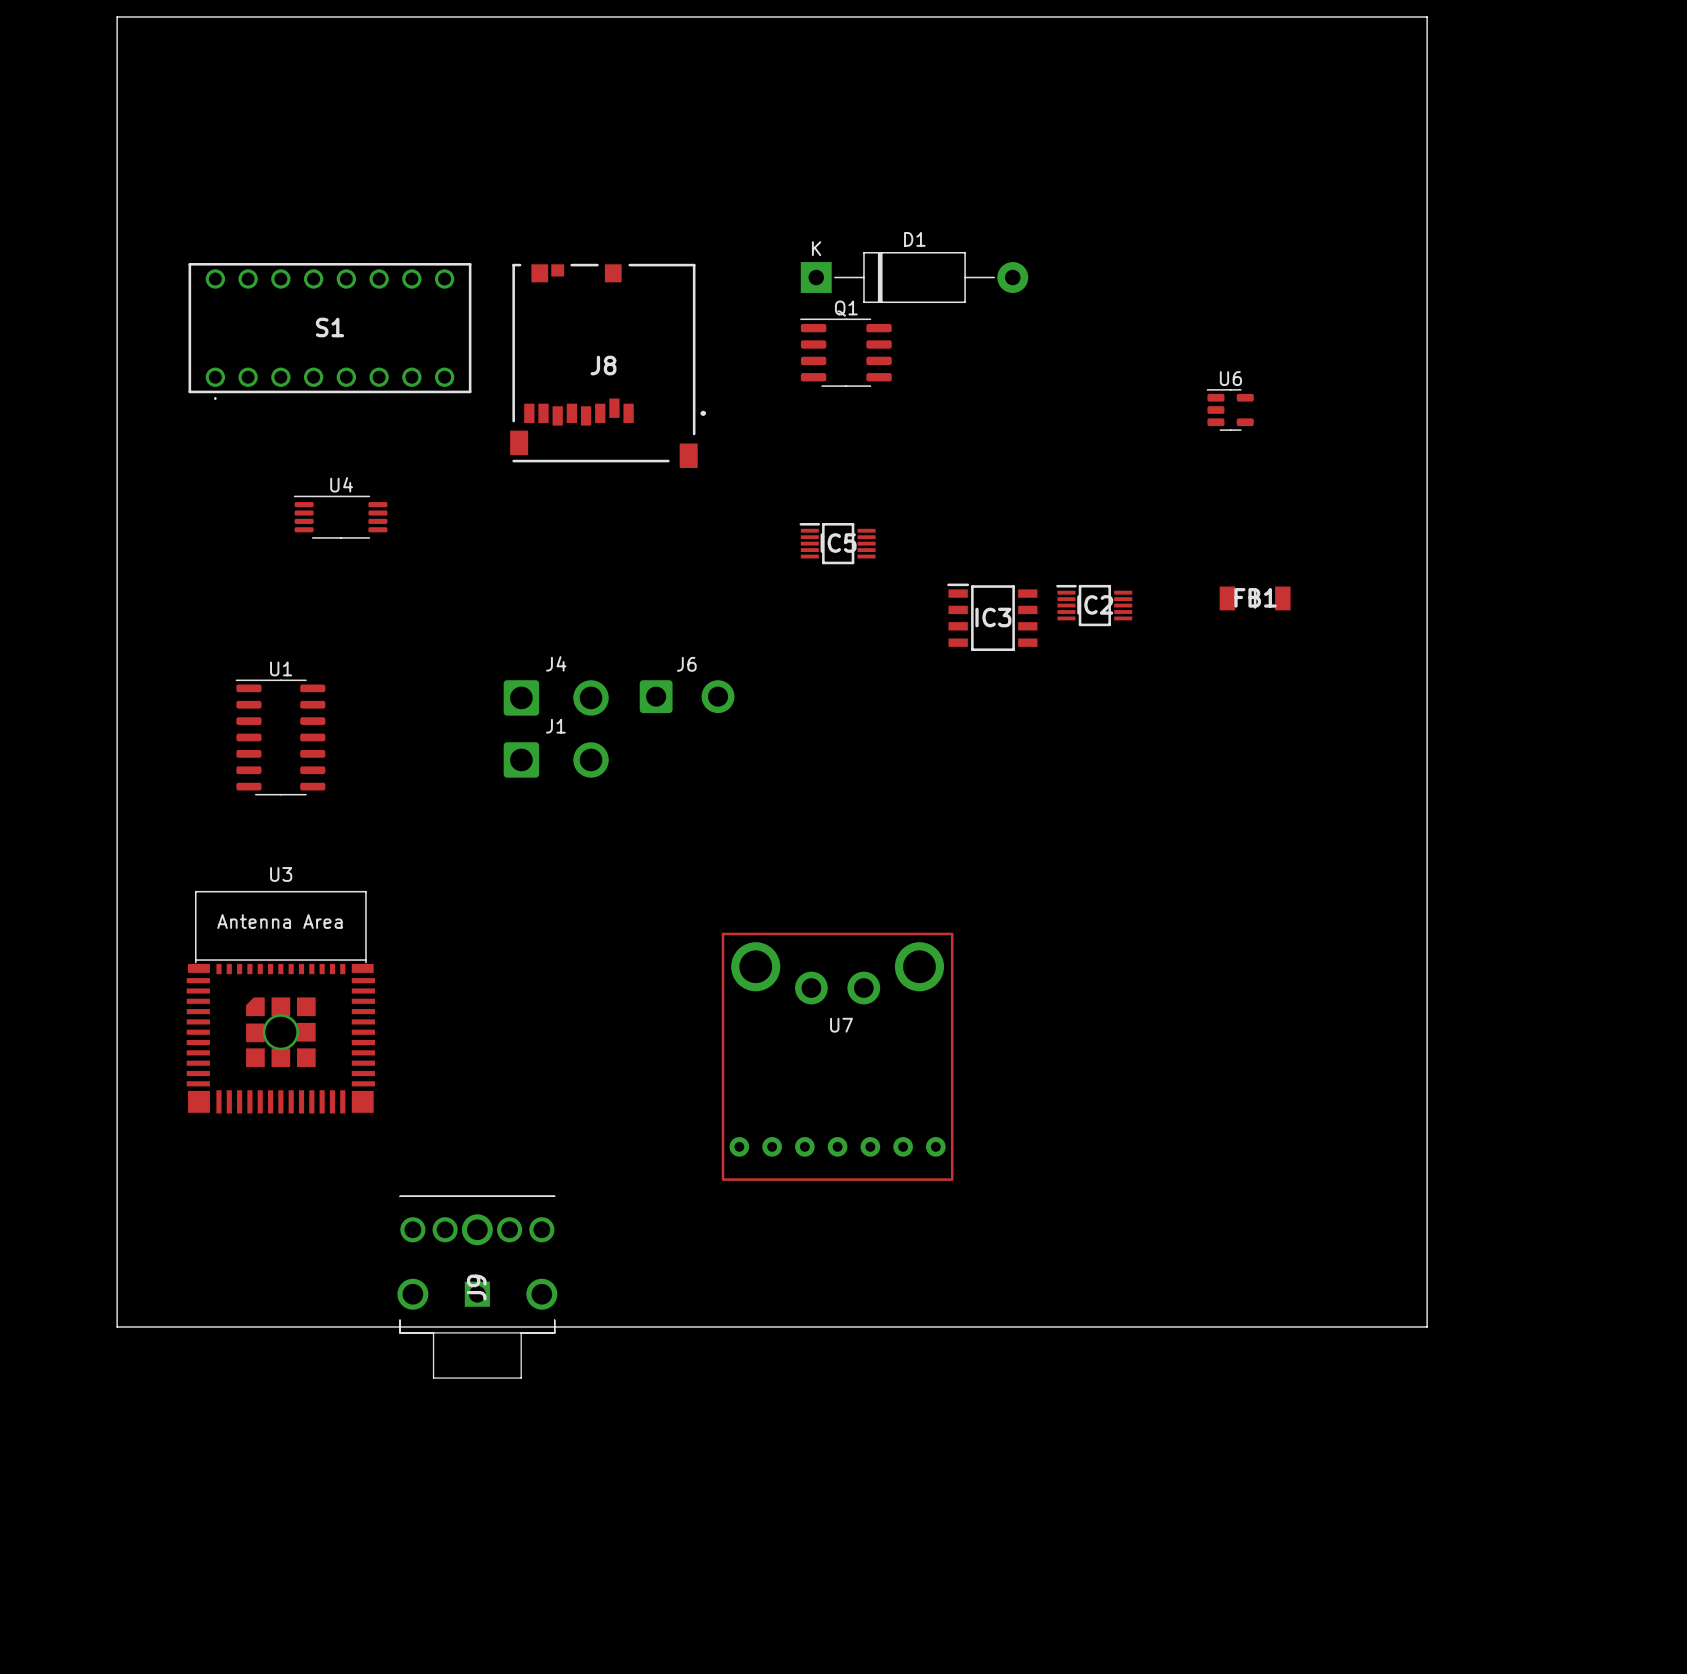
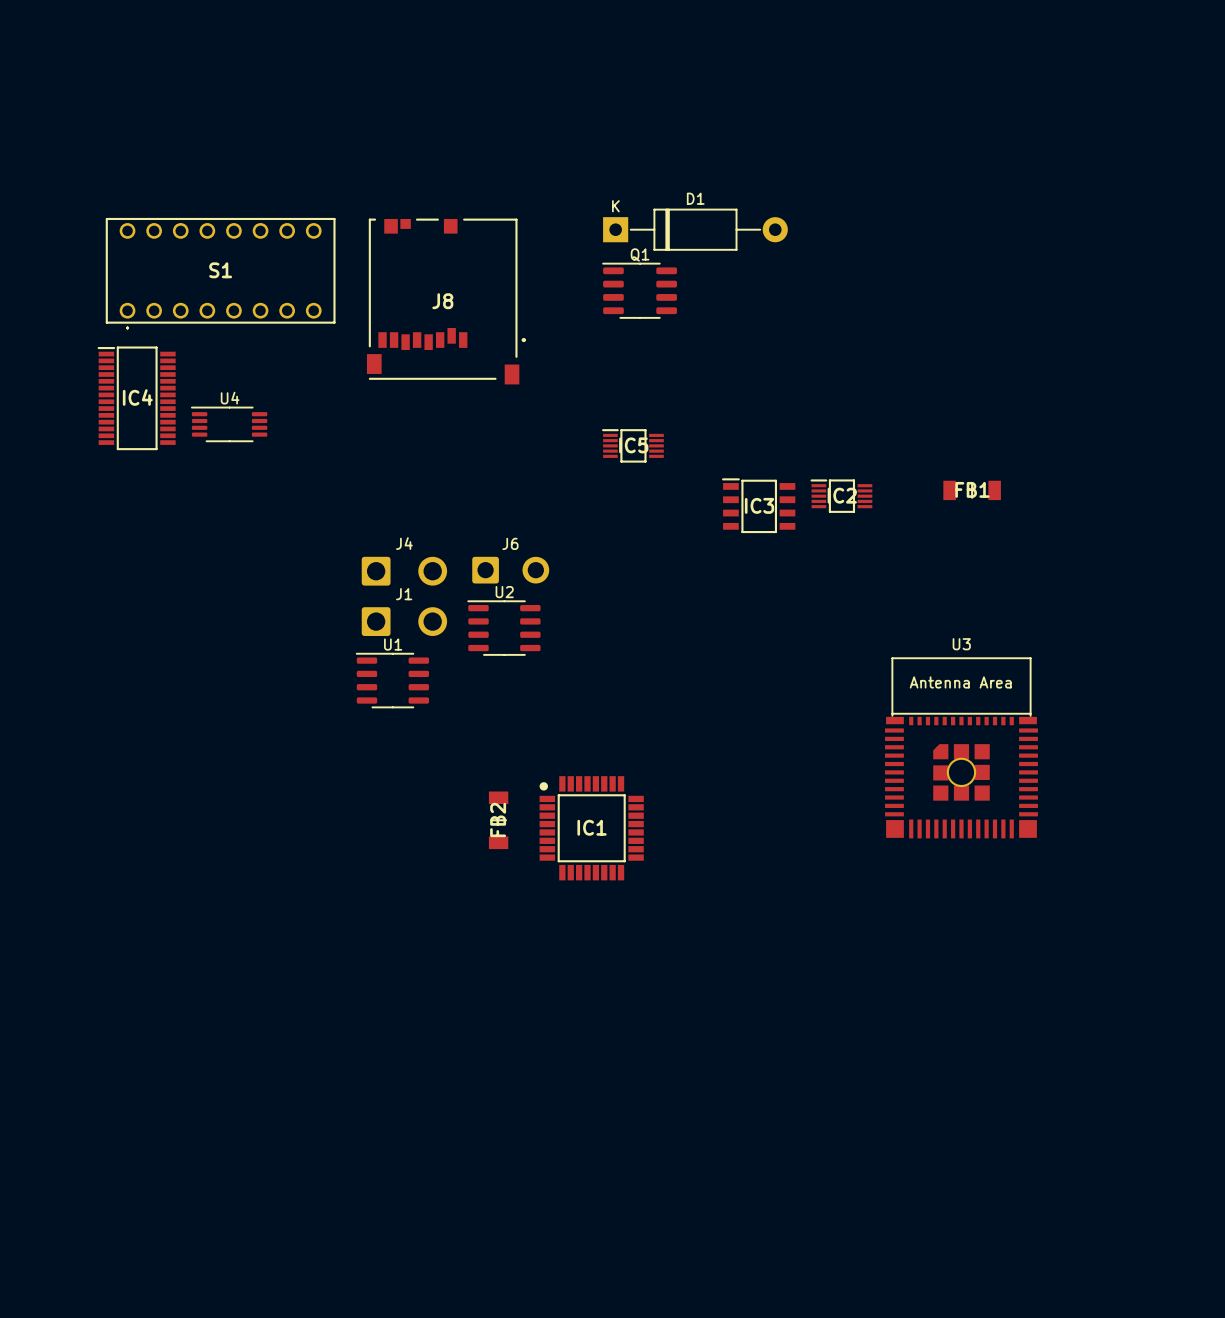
board edge: (117, 16) (1427, 16) (1427, 1326) (117, 1326) (117, 16) -> none
U6: (1230, 409) -> none
IC4: none -> (136, 398)
U1 footprint: [235, 679, 326, 796] -> [356, 653, 430, 709]
U2: none -> (504, 628)
U3 position: (280, 1002) -> (961, 748)
FB2: none -> (498, 820)
IC1: none -> (591, 828)
U7: (837, 1056) -> none
J9: (477, 1287) -> none

